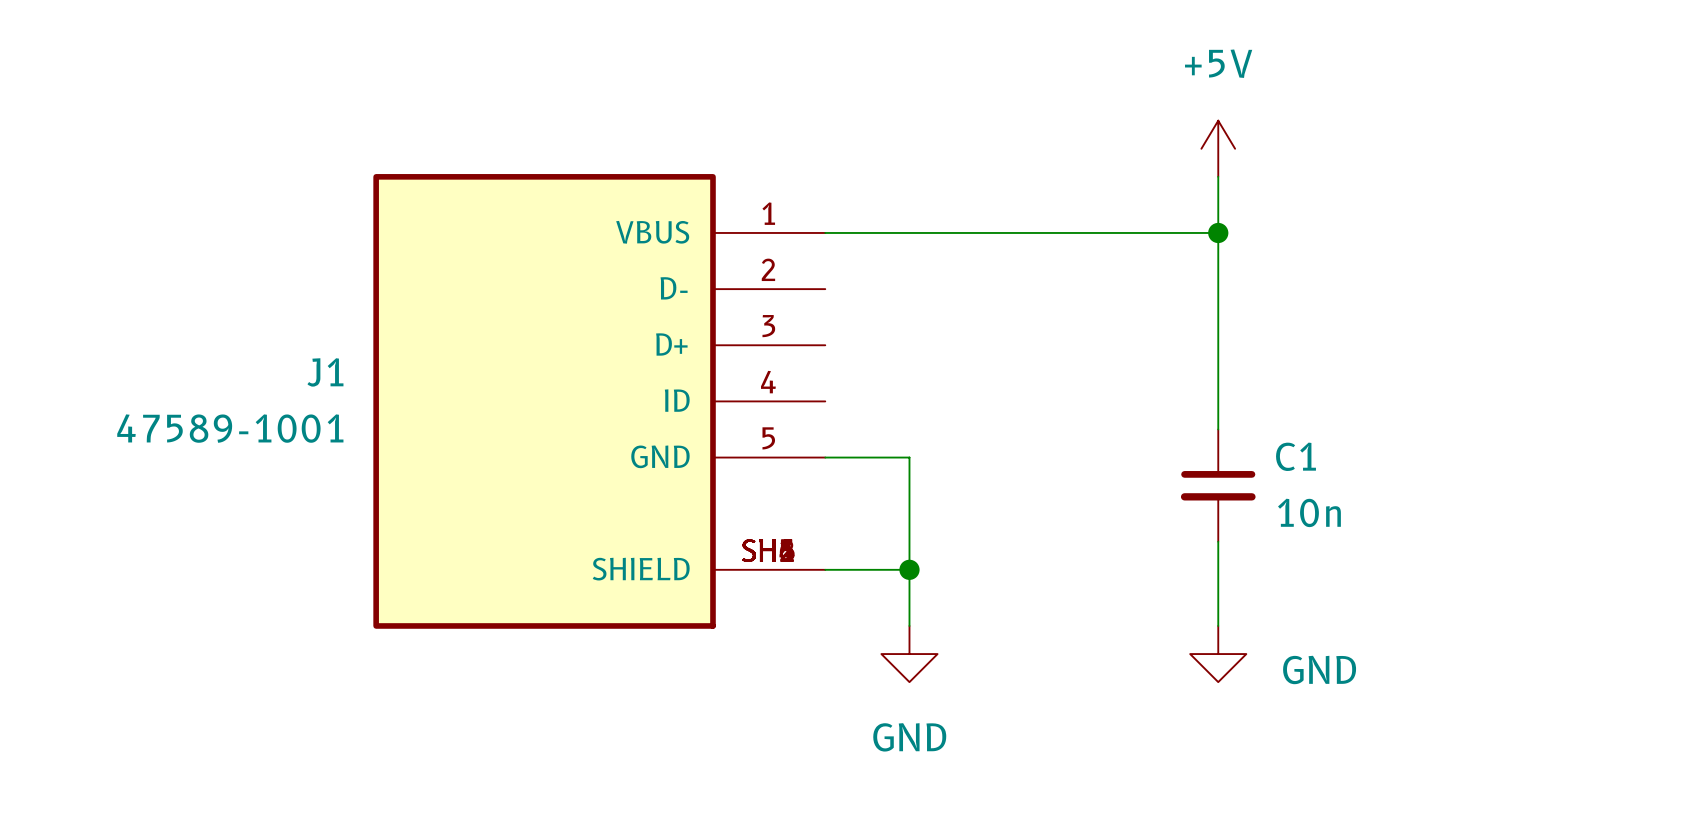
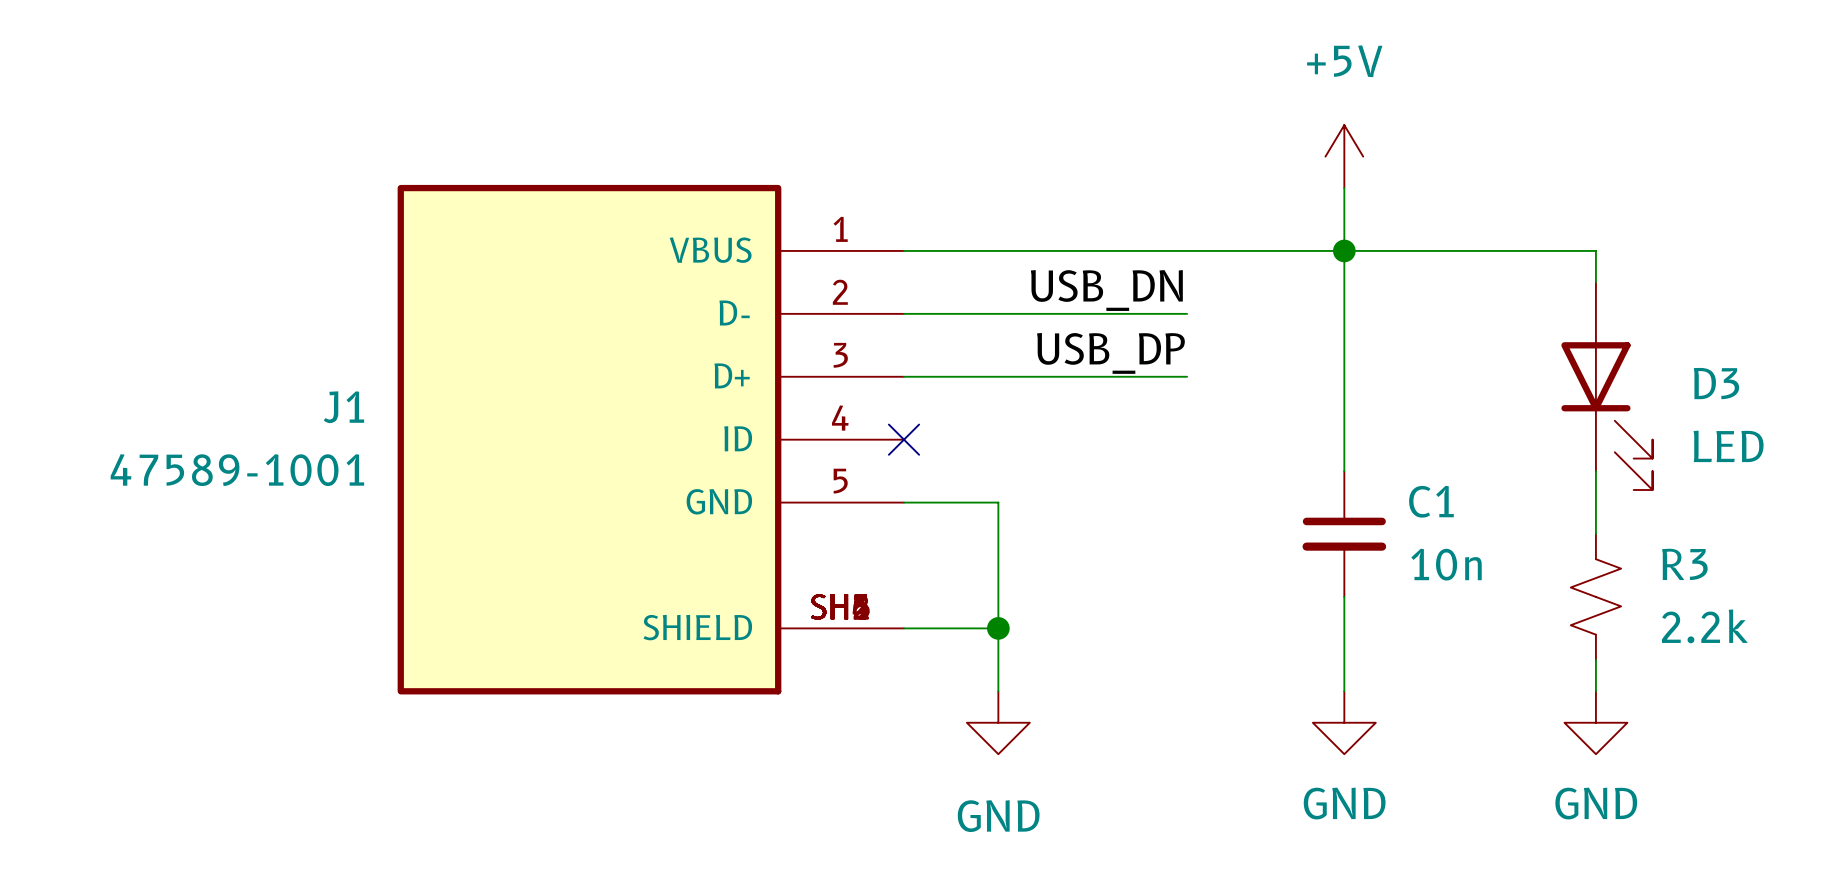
wire: none -> (1344, 250) (1595, 250) (1595, 282)
label: none -> USB_DN (1106, 290)
wire: none -> (904, 313) (1187, 313)
label: none -> USB_DP (1110, 353)
wire: none -> (904, 376) (1187, 376)
D3: none -> LED (1606, 386)
no-connect mark: none -> (904, 439)
wire: none -> (1595, 471) (1595, 534)
R3: none -> 2.2k (1595, 596)
wire: none -> (1595, 659) (1595, 691)
power symbol: none -> GND (1595, 722)
power symbol text position: GND (1319, 669) -> GND (1344, 803)

